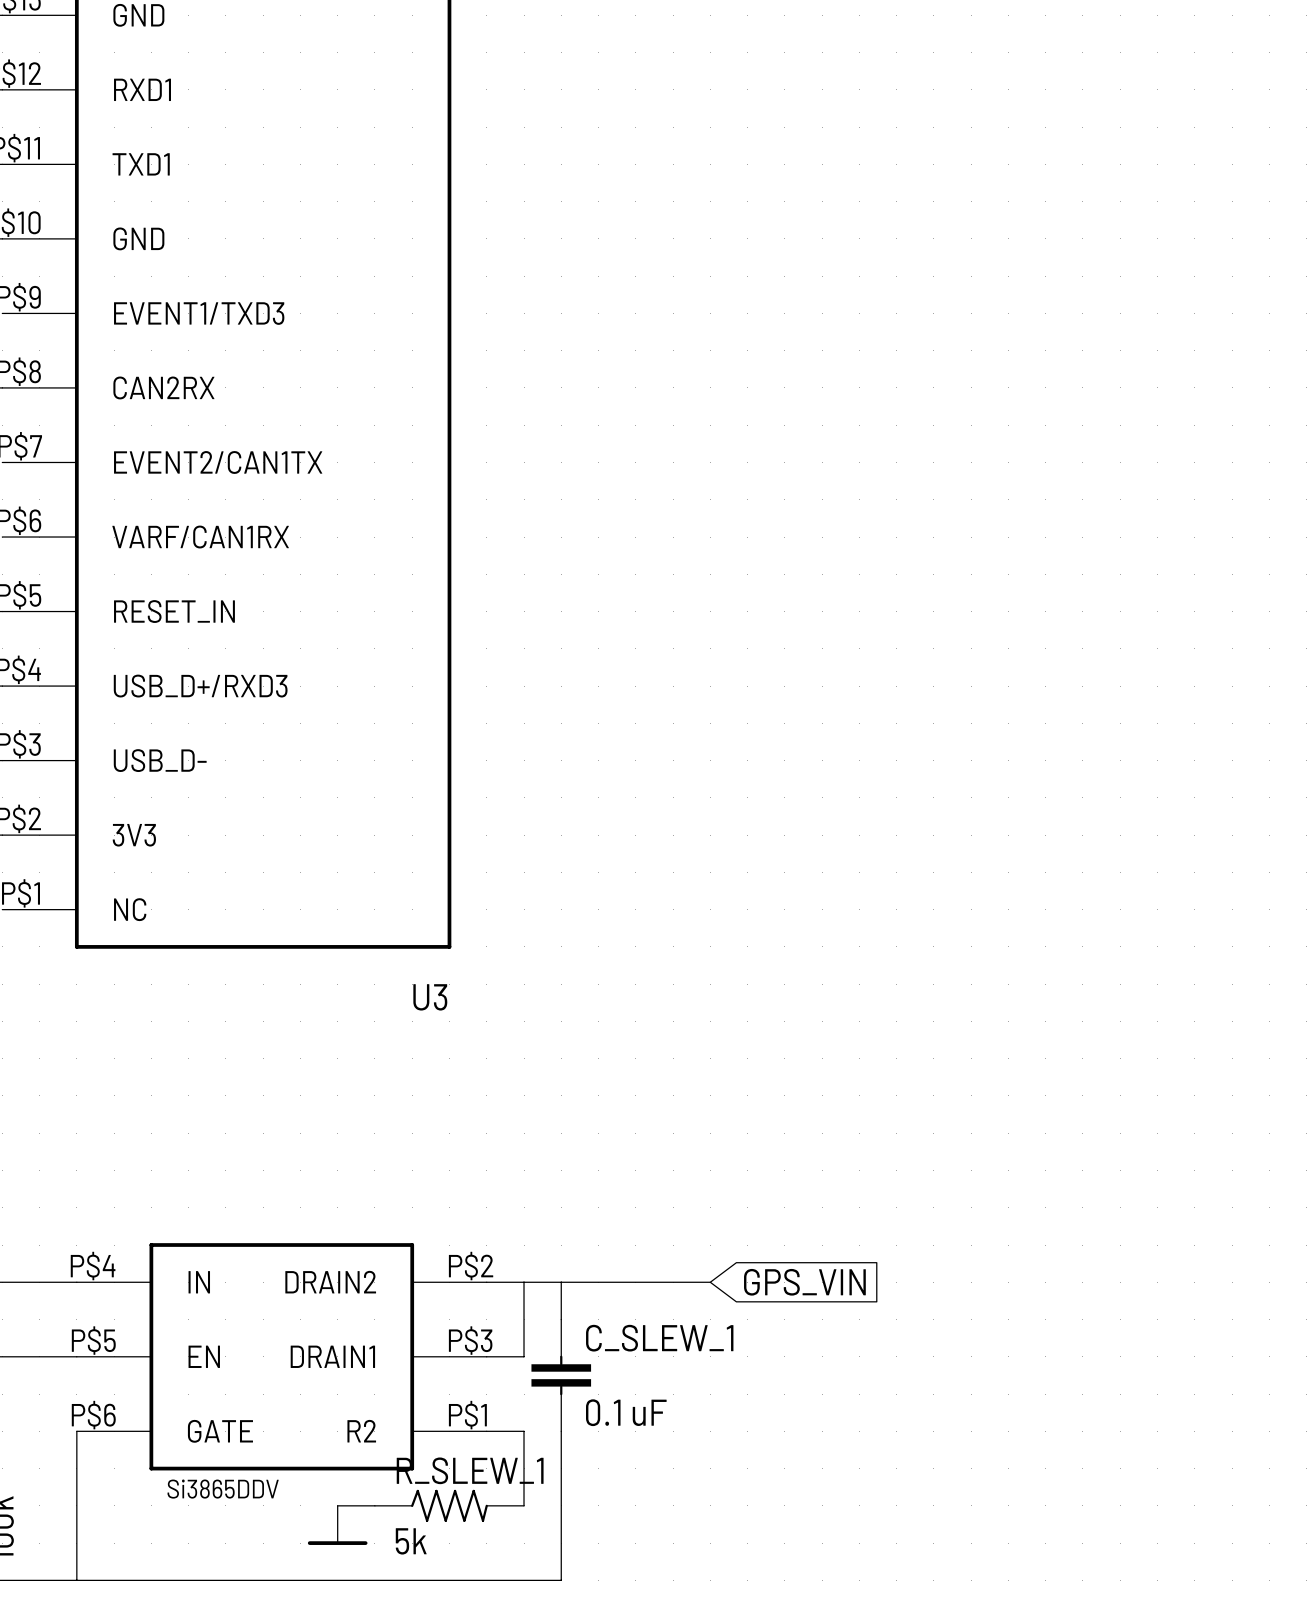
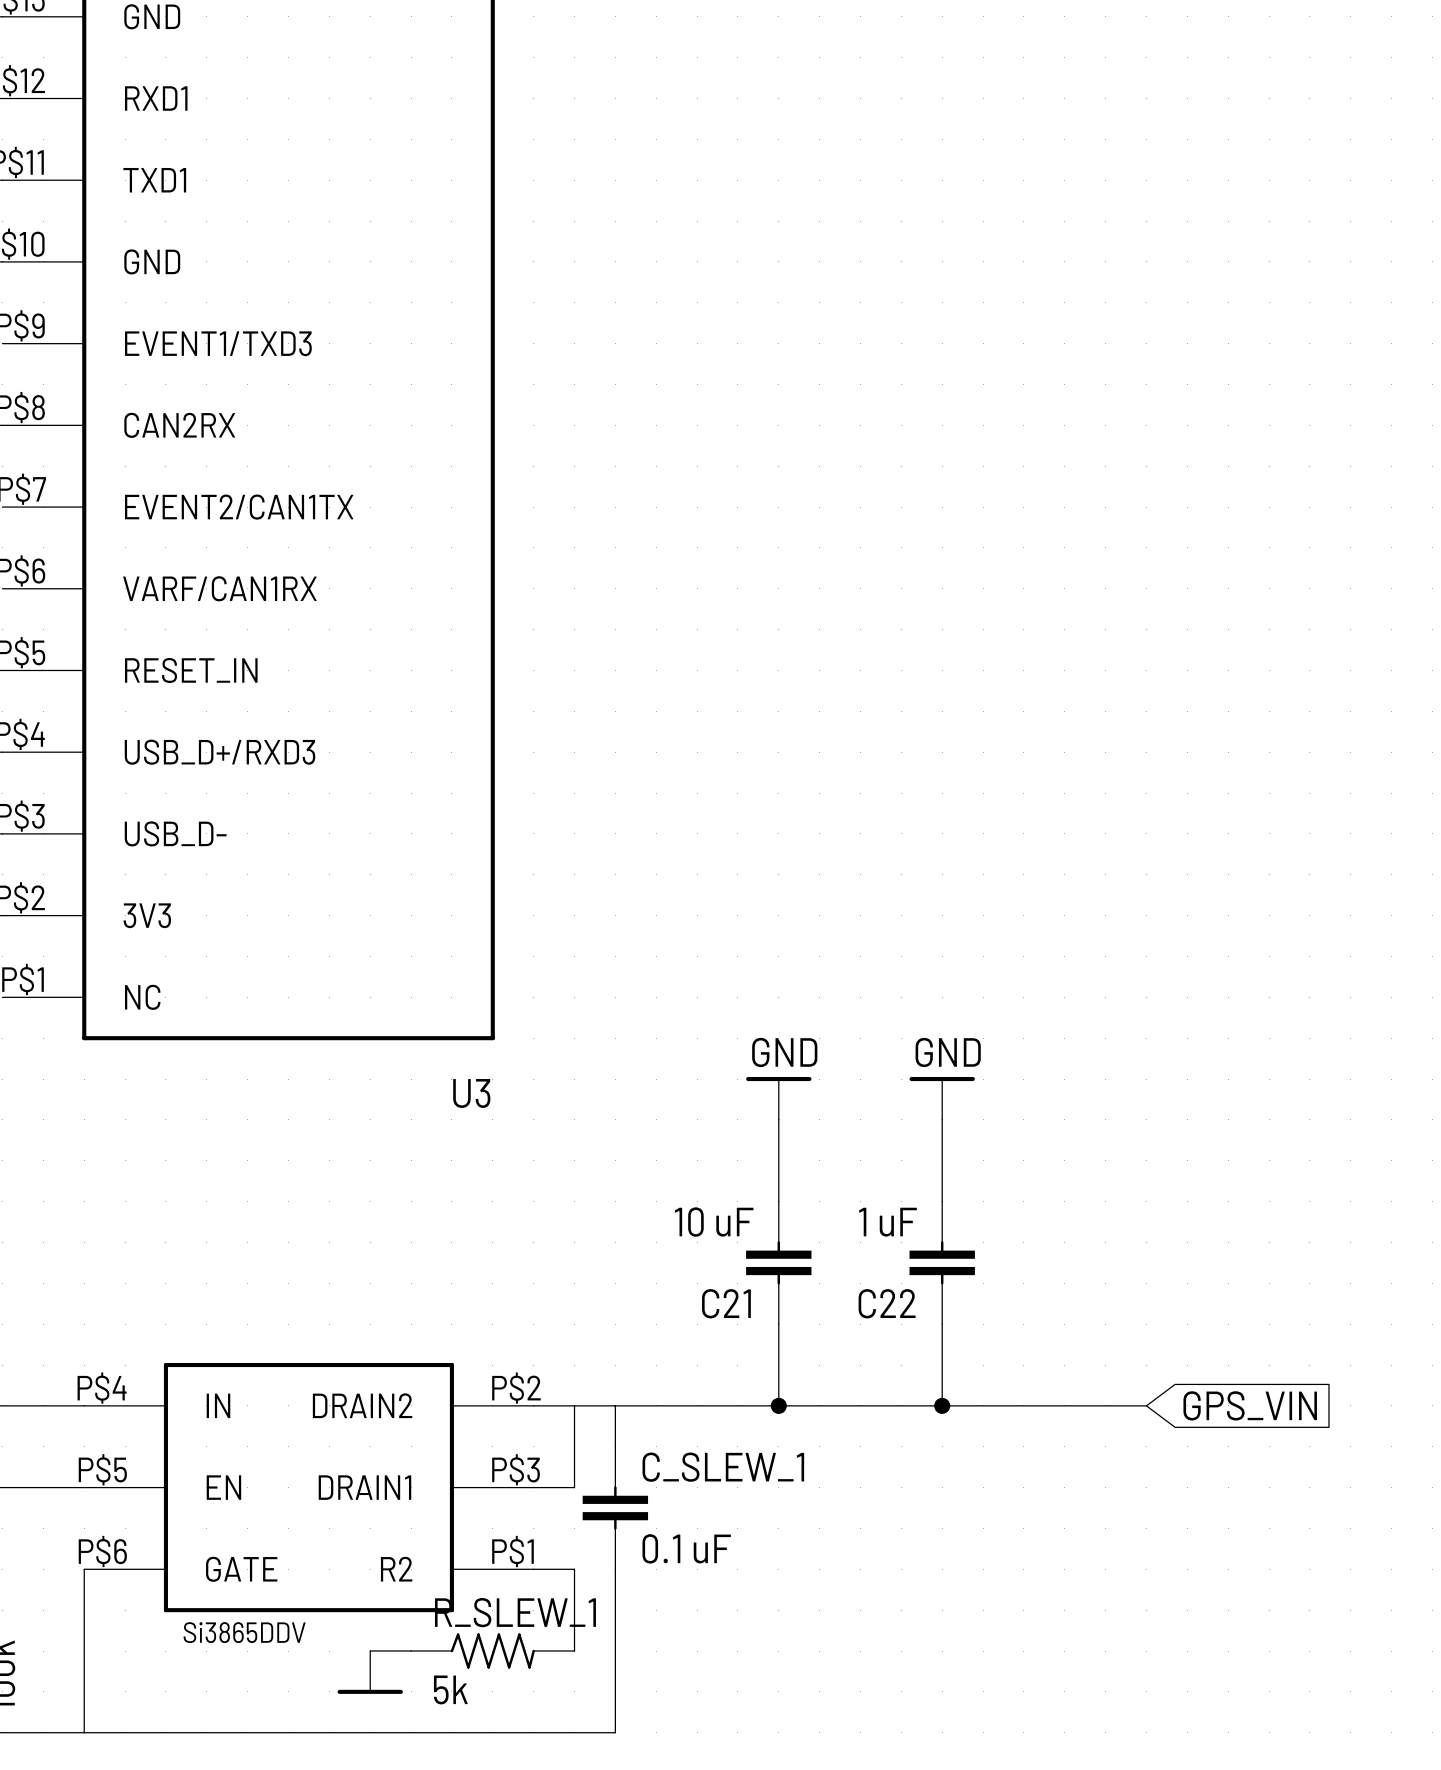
power symbol: none -> GND (778, 1098)
power symbol: none -> GND (942, 1098)
wire: none -> (778, 1119) (778, 1201)
wire: none -> (942, 1119) (942, 1201)
C21: none -> 10 uF (778, 1262)
C22: none -> 1 uF (942, 1262)
wire: none -> (778, 1324) (778, 1405) (1146, 1405)
wire: none -> (942, 1324) (942, 1405)
junction: none -> (778, 1405)
global label position: GPS_VIN (804, 1282) -> GPS_VIN (1250, 1405)
junction: none -> (942, 1405)

